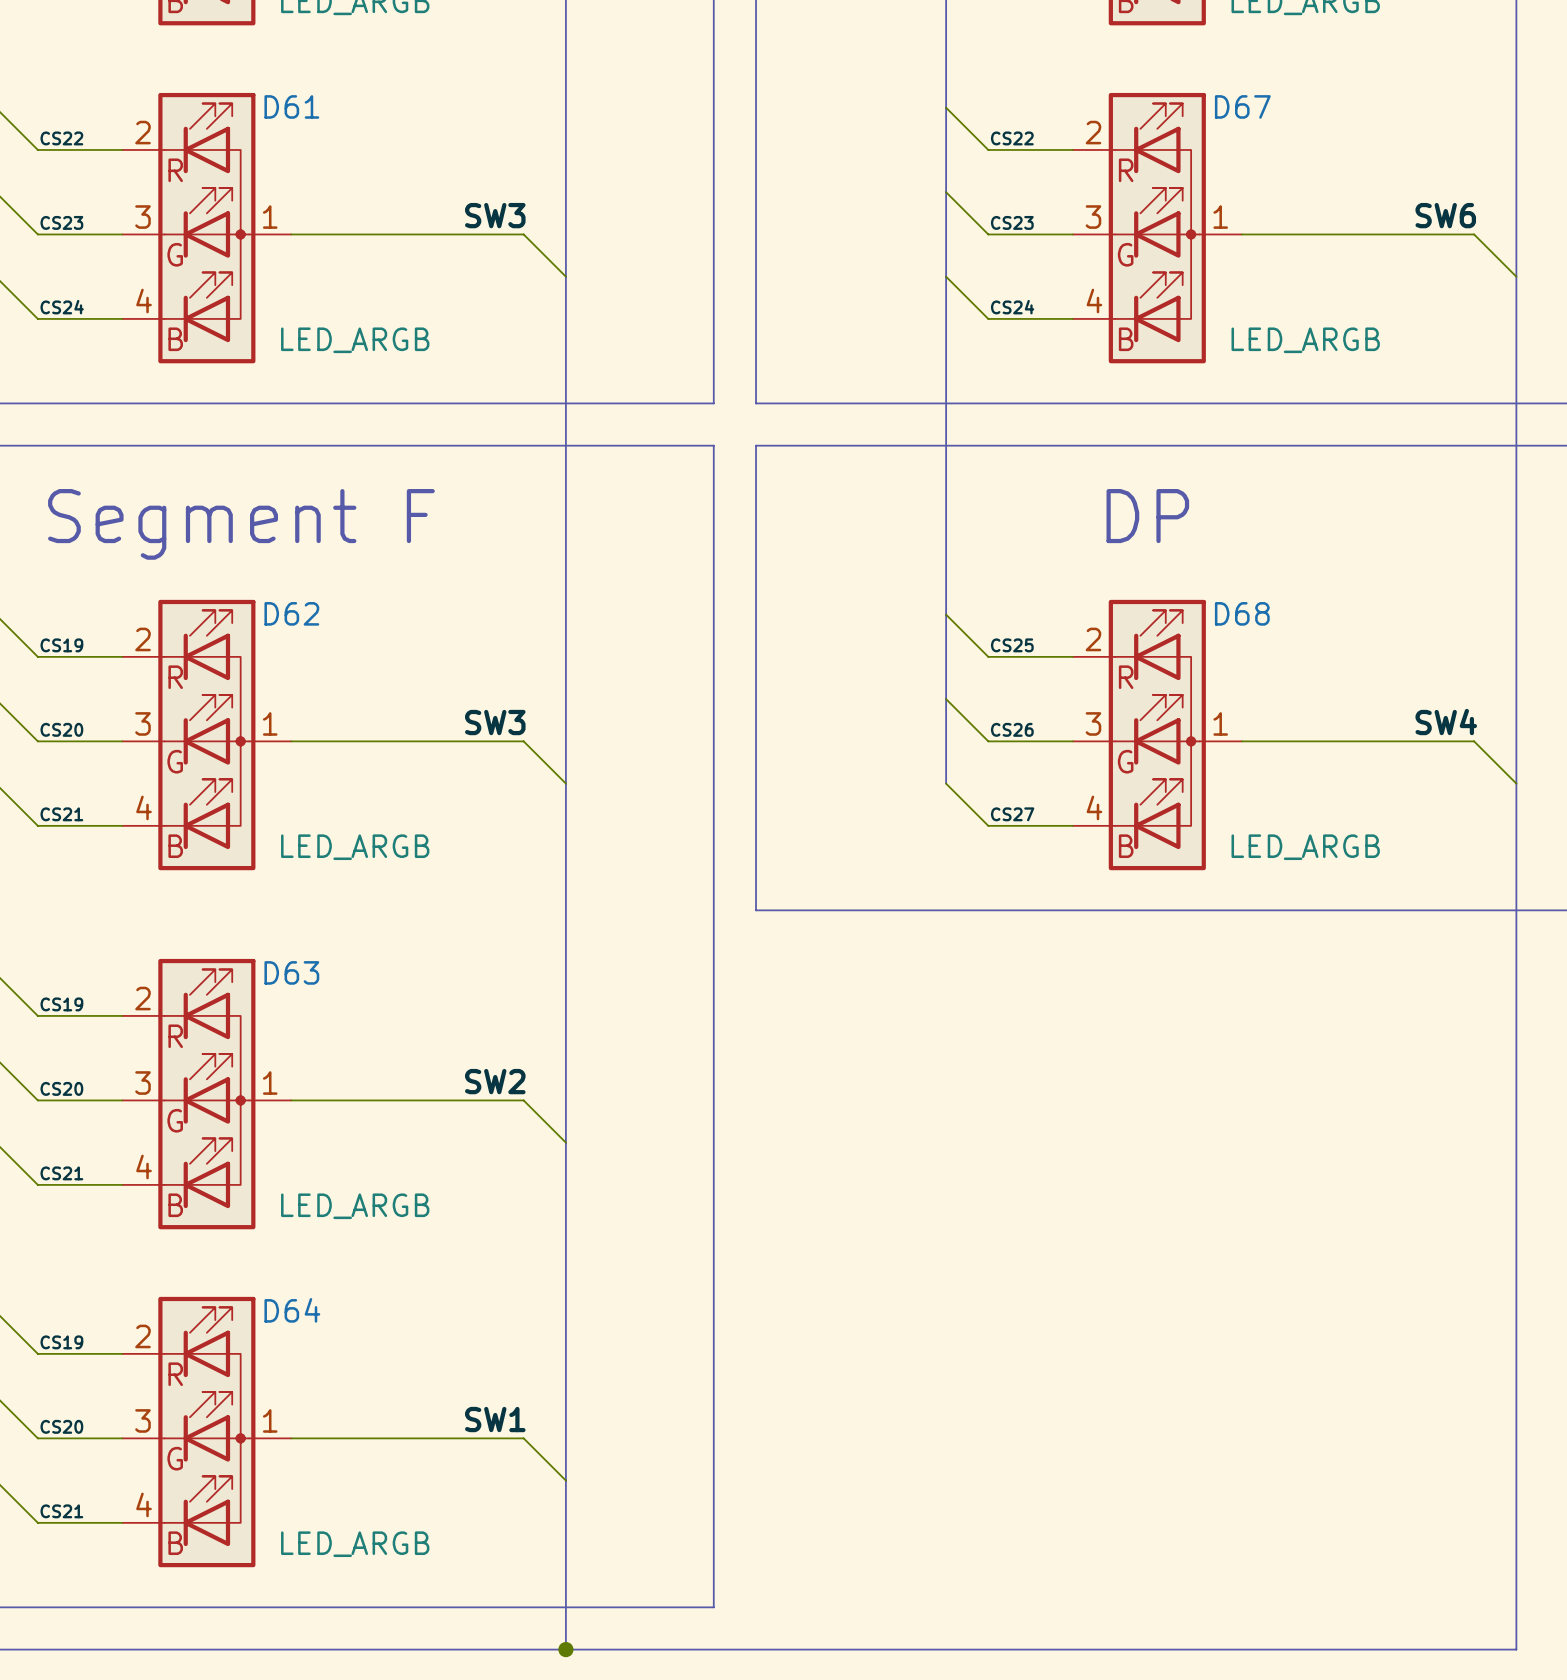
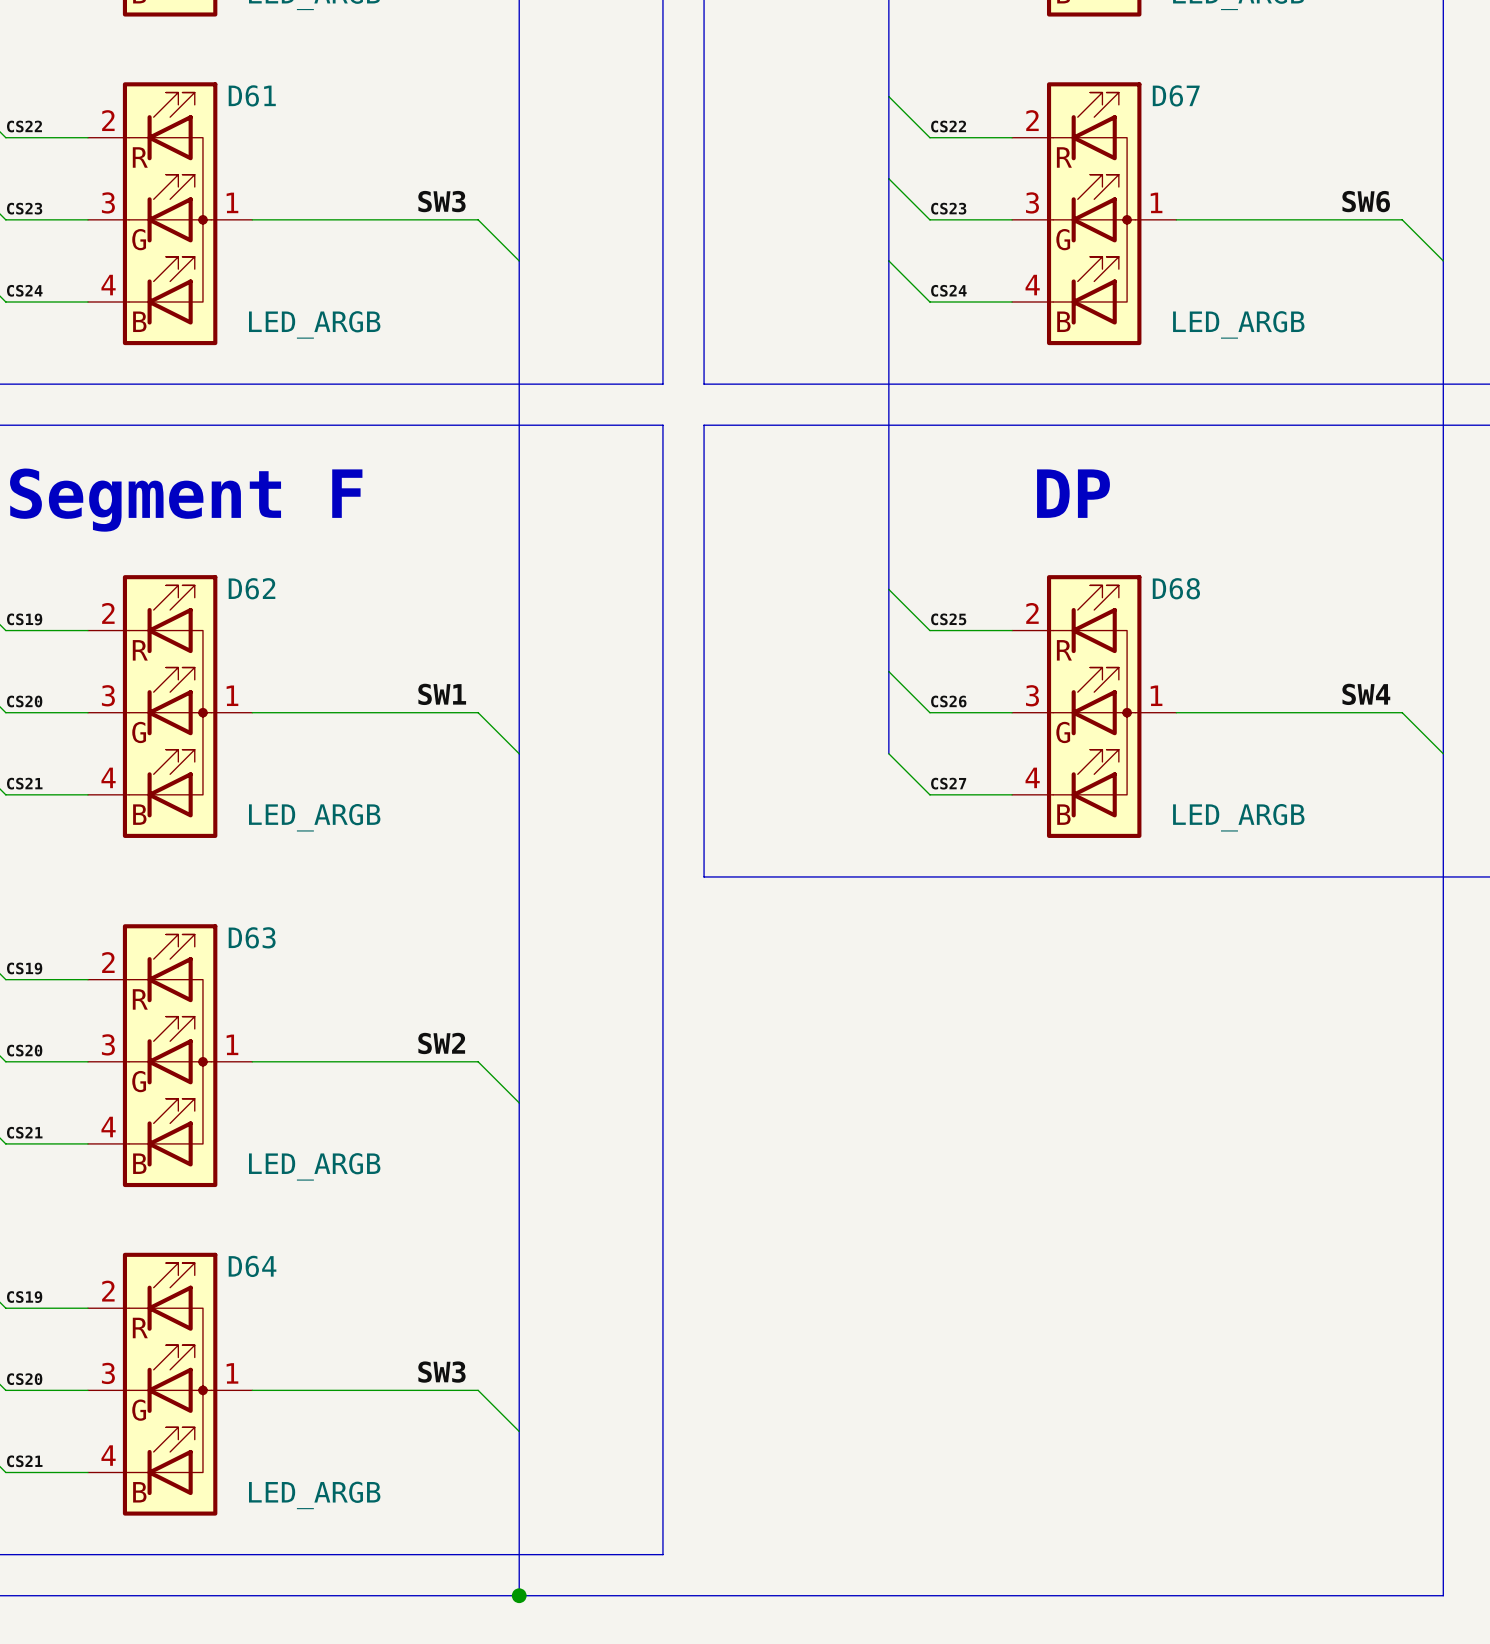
label: SW3 (495, 722) -> SW1 (442, 694)
label: SW1 (495, 1419) -> SW3 (441, 1372)

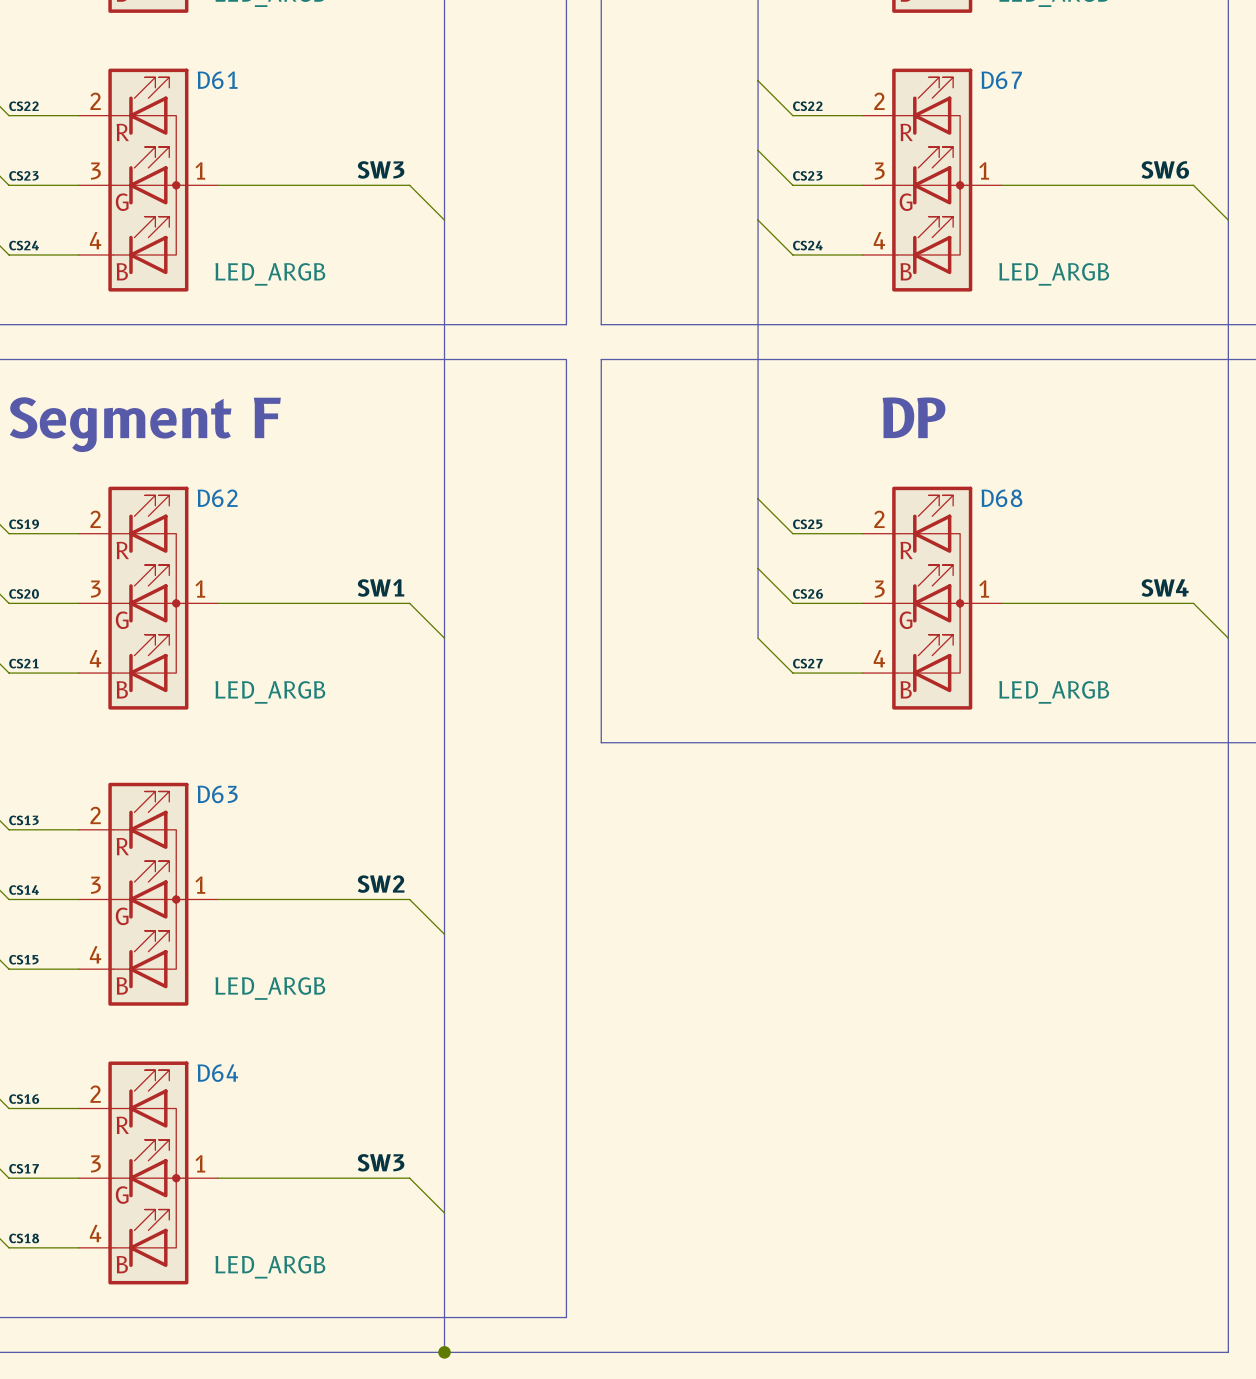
label: CS19 (24, 968) -> CS13 (23, 820)
label: CS20 (24, 1050) -> CS14 (24, 890)
label: CS21 (24, 1132) -> CS15 (23, 959)
label: CS19 (24, 1297) -> CS16 (24, 1099)
label: CS20 (24, 1379) -> CS17 (24, 1168)
label: CS21 (24, 1461) -> CS18 (24, 1238)

